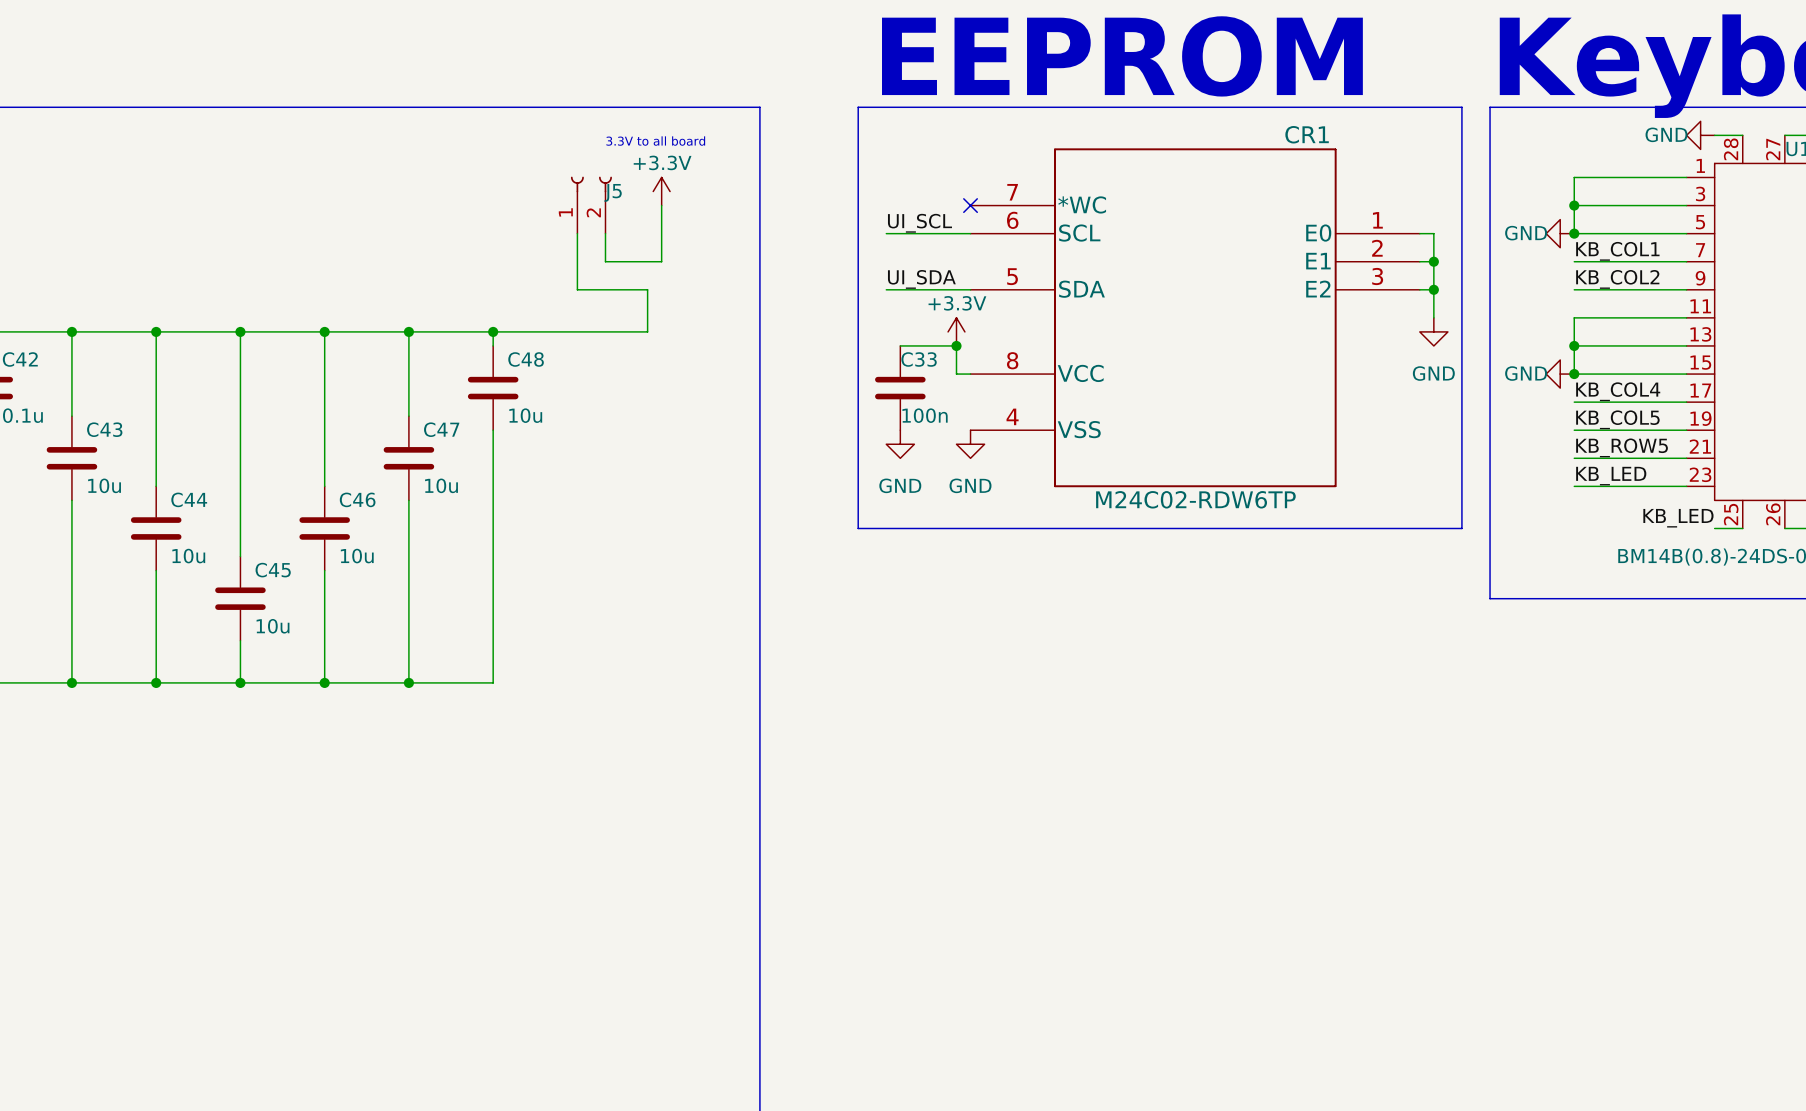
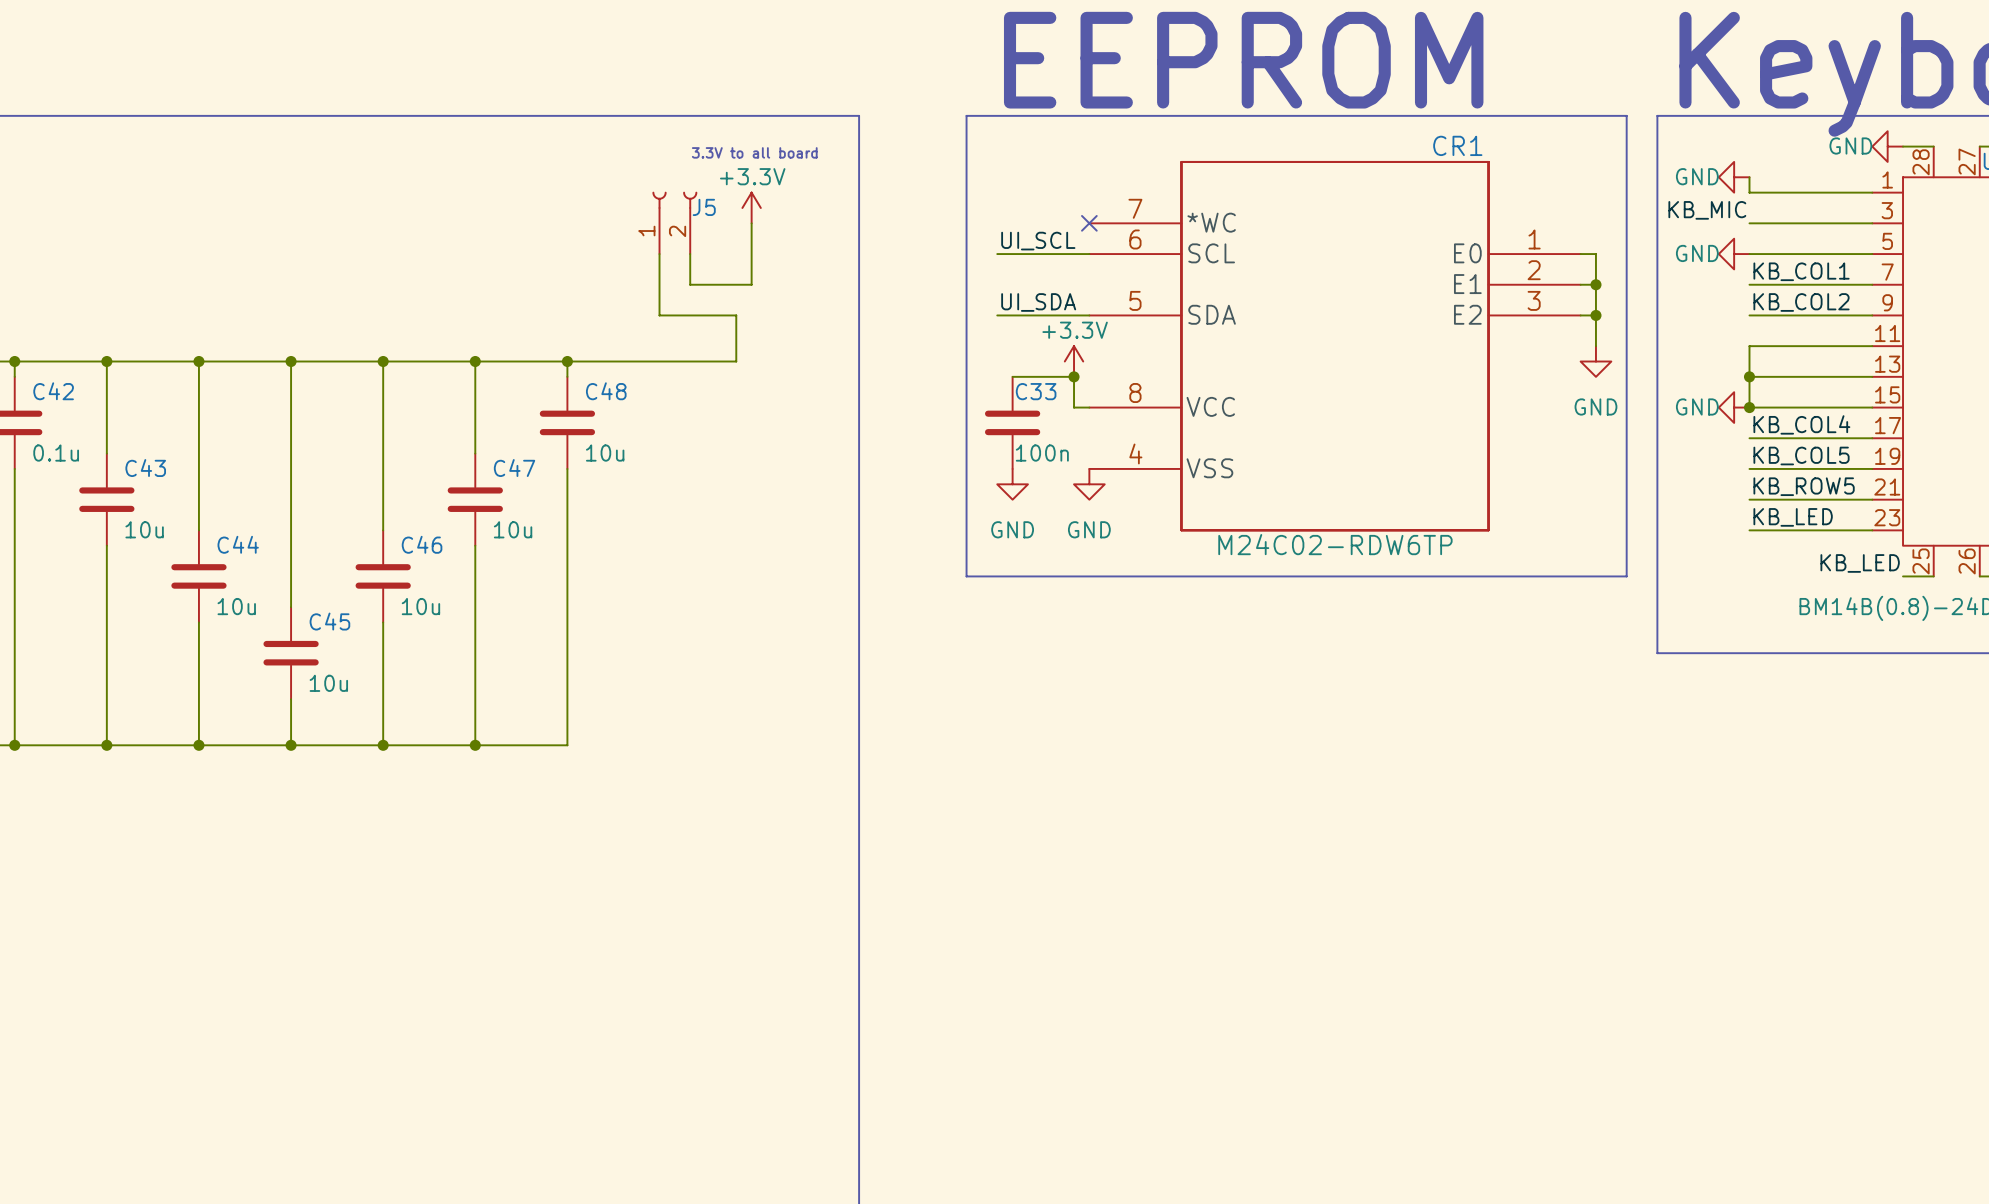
power symbol: none -> GND (1734, 177)
wire: (1574, 177) (1574, 233) -> (1749, 192) (1749, 177)
label: none -> KB_MIC (1707, 210)
junction: (1574, 205) -> none
junction: (1574, 233) -> none

